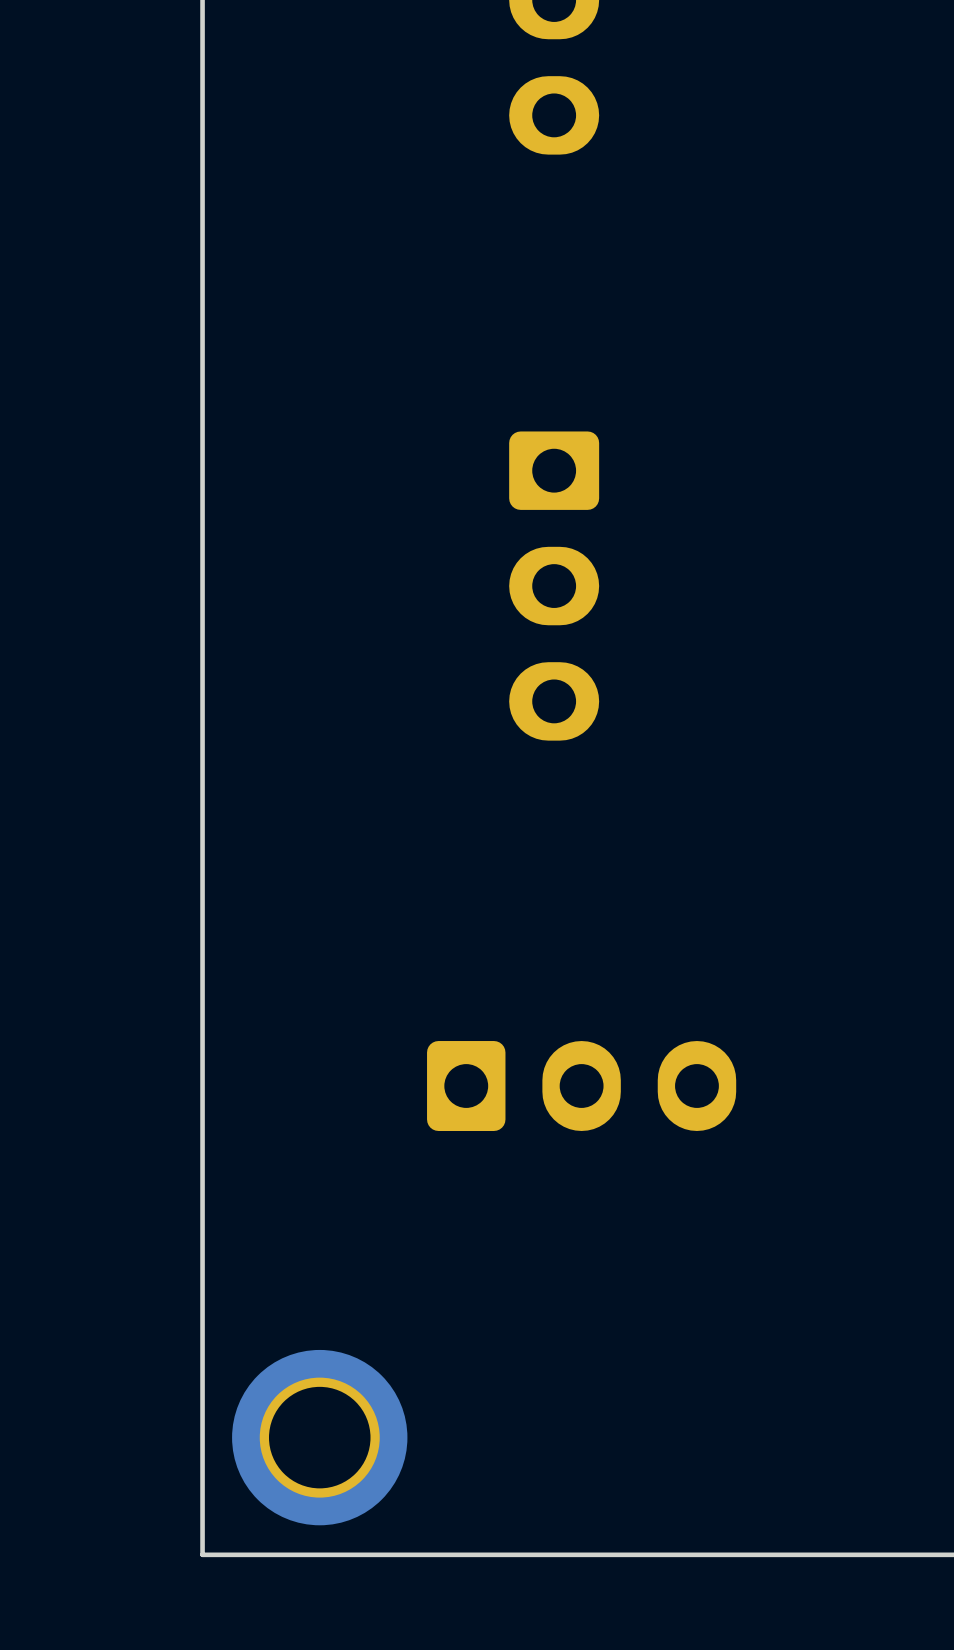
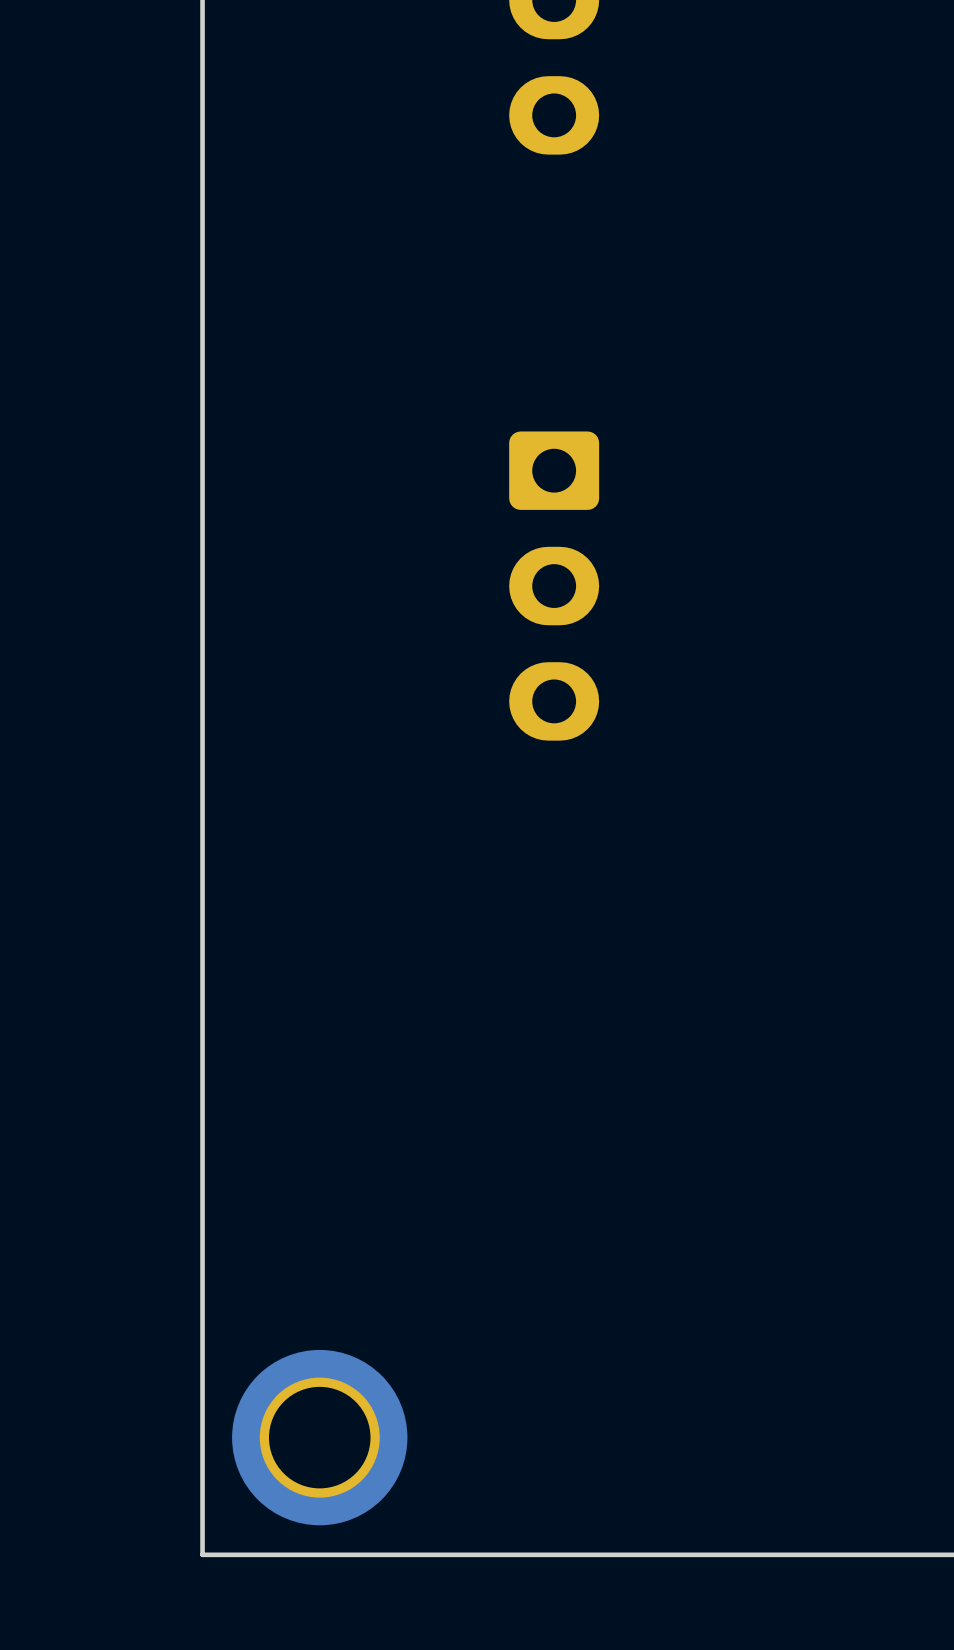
part: (581, 1086) -> none

